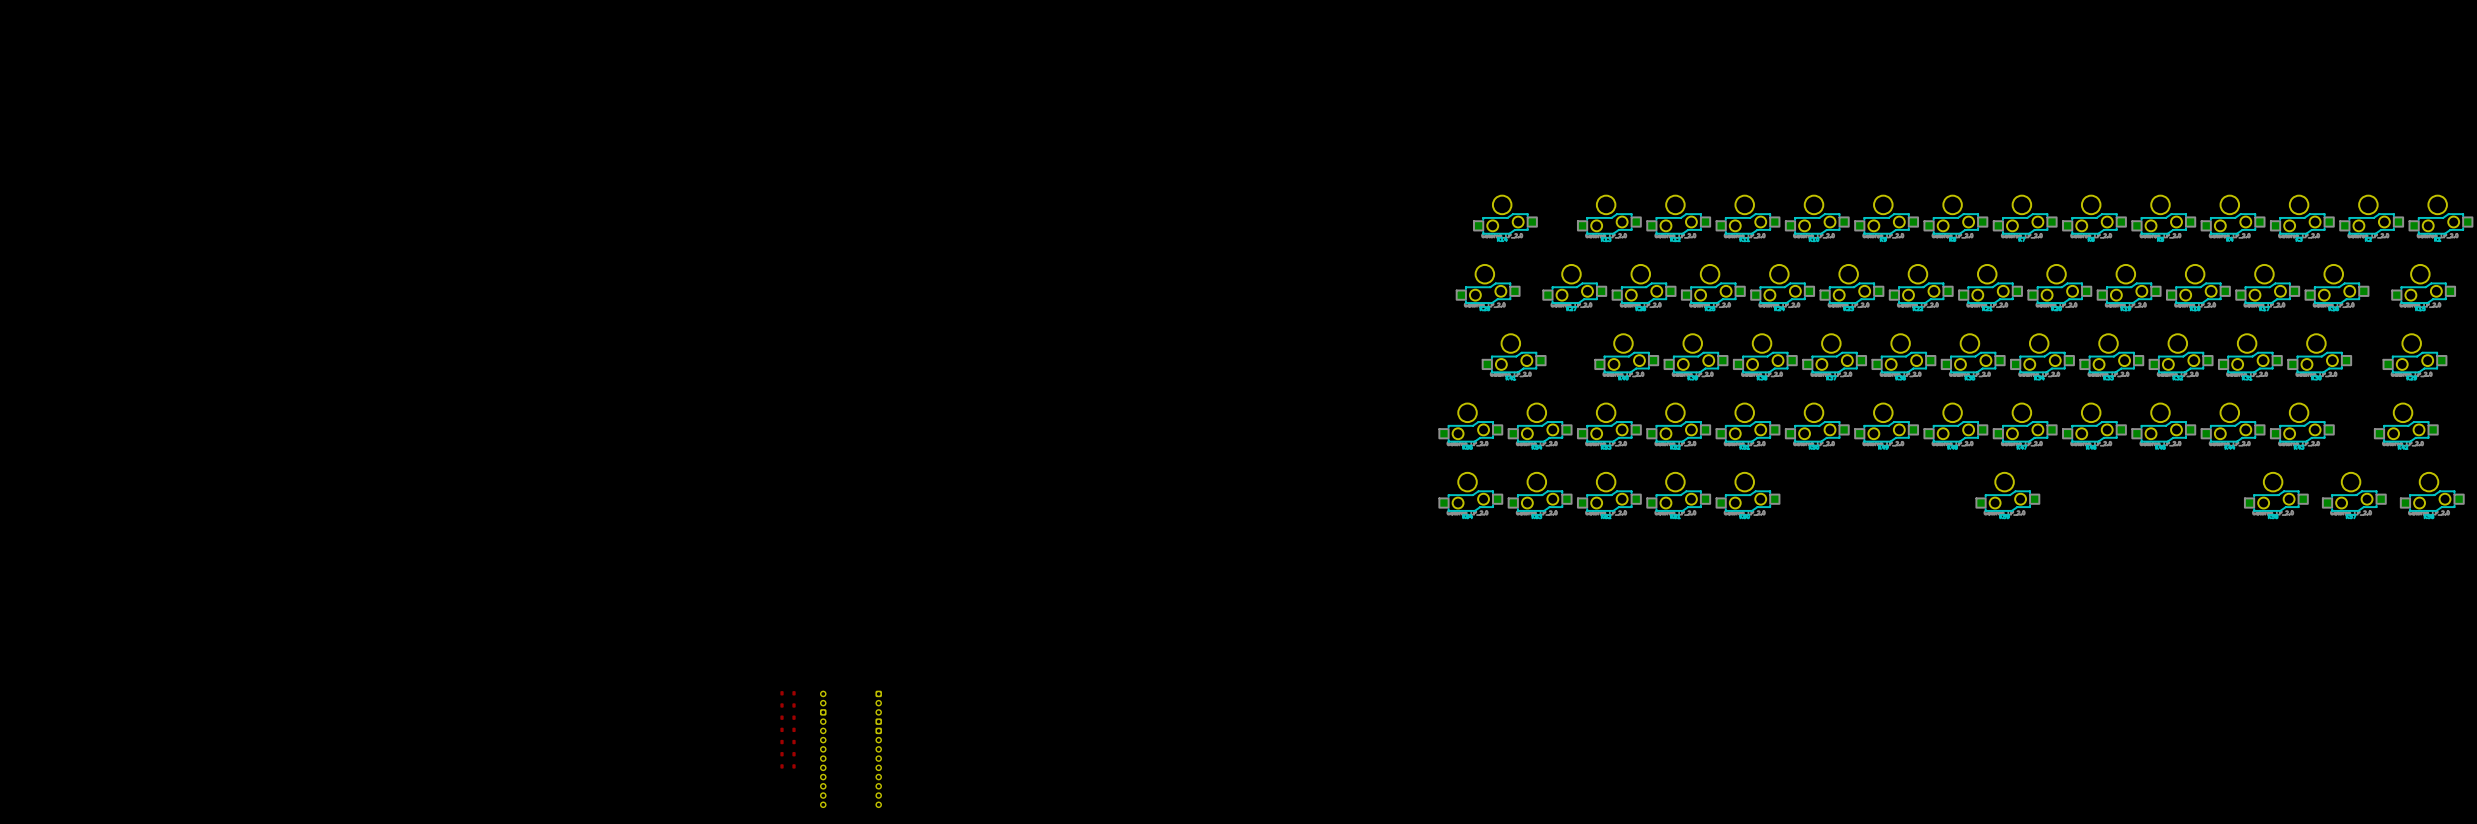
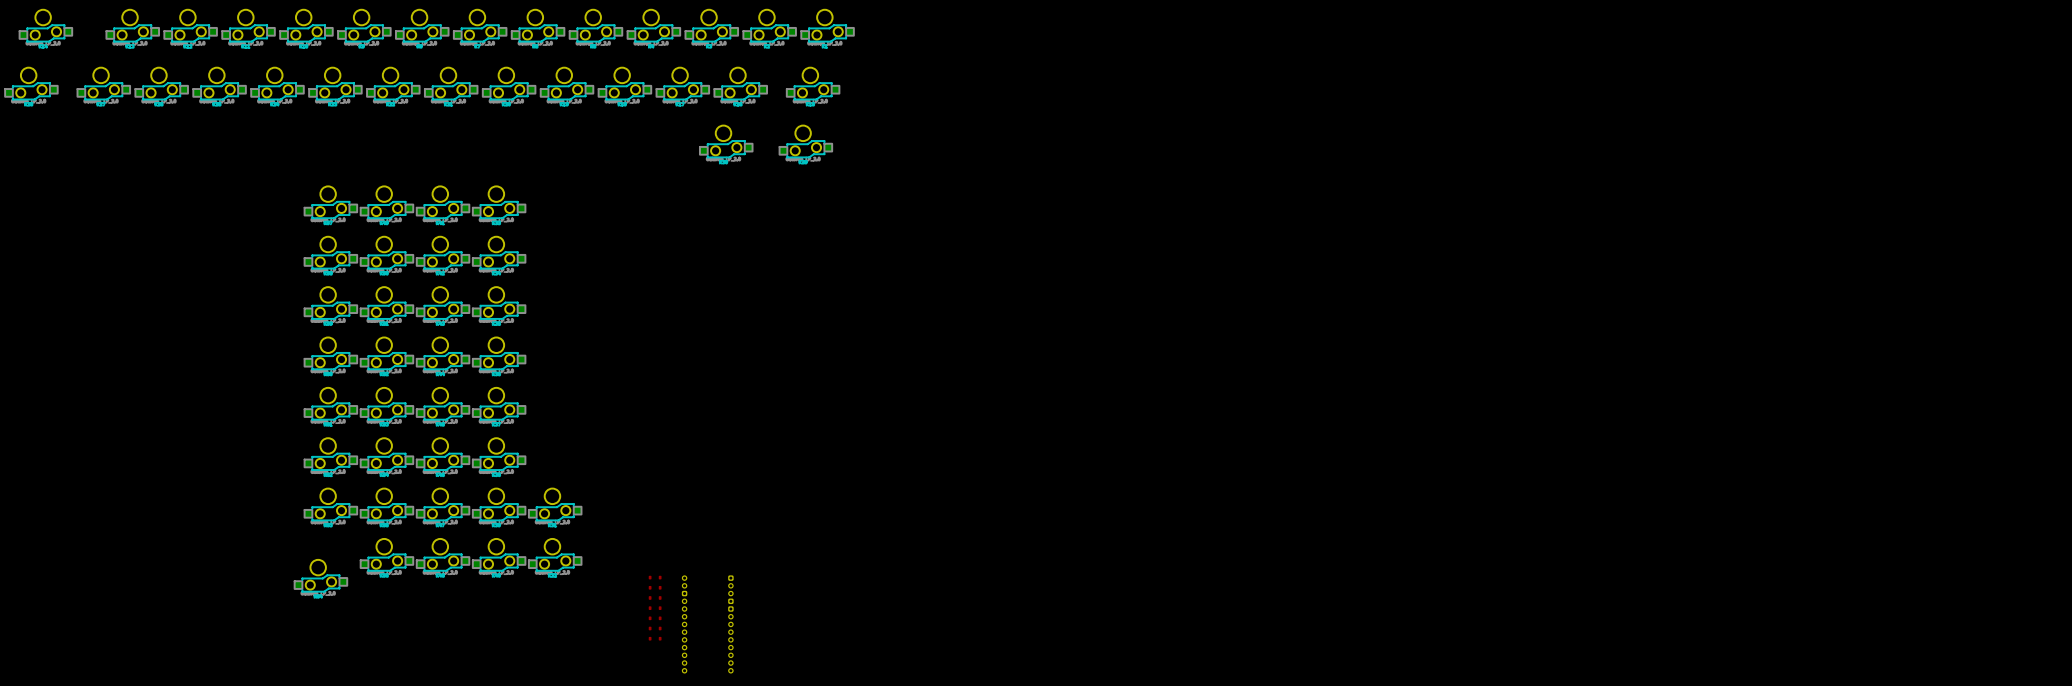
part position: (1505, 214) -> (45, 25)
part position: (1609, 214) -> (132, 25)
part position: (1678, 214) -> (190, 25)
part position: (1747, 214) -> (248, 25)
part position: (1817, 214) -> (306, 25)
part position: (1886, 214) -> (364, 25)
part position: (1955, 214) -> (422, 25)
part position: (2025, 214) -> (480, 25)
part position: (2094, 214) -> (538, 25)
part position: (2163, 214) -> (595, 25)
part position: (2233, 214) -> (653, 25)
part position: (2302, 214) -> (711, 25)
part position: (2371, 214) -> (769, 25)
part position: (2440, 214) -> (827, 25)
part position: (1488, 284) -> (31, 83)
part position: (1574, 284) -> (103, 83)
part position: (1644, 284) -> (161, 83)
part position: (1713, 284) -> (219, 83)
part position: (1782, 284) -> (277, 83)
part position: (1851, 284) -> (335, 83)
part position: (1921, 284) -> (393, 83)
part position: (1990, 284) -> (451, 83)
part position: (2059, 284) -> (509, 83)
part position: (2129, 284) -> (567, 83)
part position: (2198, 284) -> (624, 83)
part position: (2267, 284) -> (682, 83)
part position: (2337, 284) -> (740, 83)
part position: (2423, 284) -> (813, 83)
part position: (1514, 353) -> (443, 202)
part position: (1626, 353) -> (499, 554)
part position: (1696, 353) -> (499, 504)
part position: (1765, 353) -> (499, 454)
part position: (1834, 353) -> (499, 403)
part position: (1903, 353) -> (499, 353)
part position: (1973, 353) -> (499, 303)
part position: (2042, 353) -> (499, 252)
part position: (2111, 353) -> (499, 202)
part position: (2181, 353) -> (555, 554)
part position: (2250, 353) -> (555, 504)
part position: (2319, 353) -> (726, 141)
part position: (2414, 353) -> (805, 141)
part position: (1470, 422) -> (386, 504)
part position: (1540, 422) -> (386, 454)
part position: (1609, 422) -> (386, 403)
part position: (1678, 422) -> (386, 353)
part position: (1747, 422) -> (386, 303)
part position: (1817, 422) -> (386, 252)
part position: (1886, 422) -> (386, 202)
part position: (1955, 422) -> (443, 554)
part position: (2025, 422) -> (443, 504)
part position: (2094, 422) -> (443, 454)
part position: (2163, 422) -> (443, 403)
part position: (2233, 422) -> (443, 353)
part position: (2302, 422) -> (443, 303)
part position: (2406, 422) -> (443, 252)
part position: (1470, 492) -> (320, 575)
part position: (1540, 492) -> (330, 504)
part position: (1609, 492) -> (330, 454)
part position: (1678, 492) -> (330, 403)
part position: (1747, 492) -> (330, 353)
part position: (2007, 492) -> (330, 303)
part position: (2276, 492) -> (330, 252)
part position: (2354, 492) -> (330, 202)
part position: (2432, 492) -> (386, 554)

